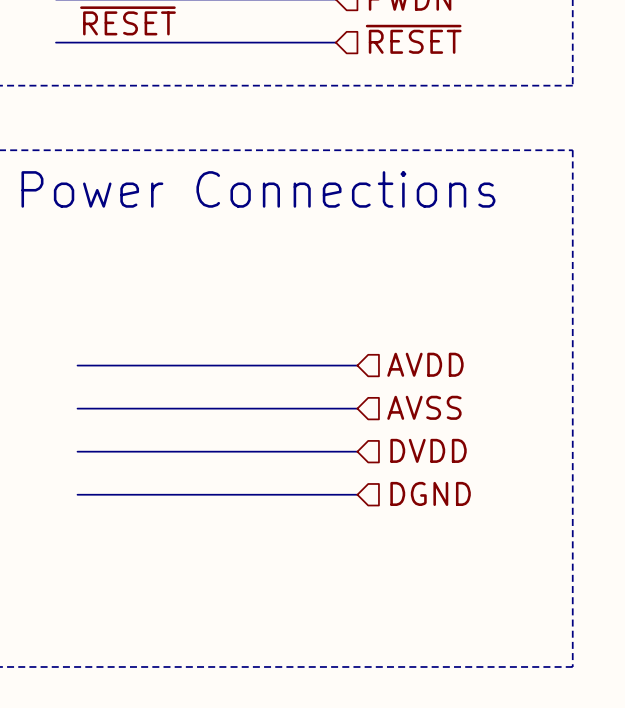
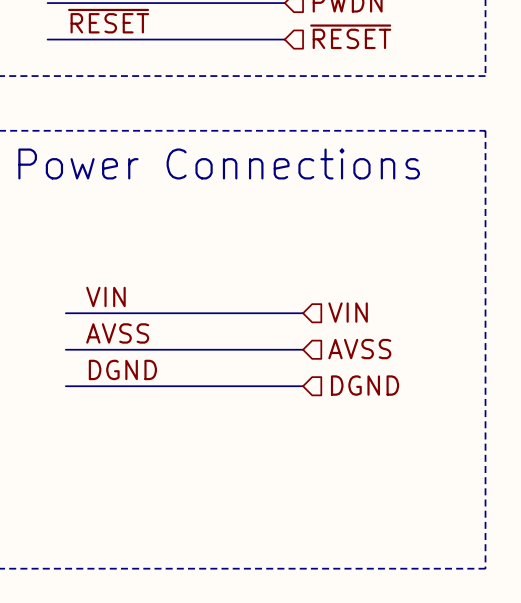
label: none -> VIN (105, 296)
hierarchical label: AVDD (425, 364) -> VIN (348, 312)
label: none -> AVSS (117, 333)
label: none -> DGND (122, 369)
hierarchical label: DVDD (428, 450) -> DGND (365, 385)
hierarchical label: DGND (430, 493) -> none
wire: (77, 494) (357, 494) -> none

